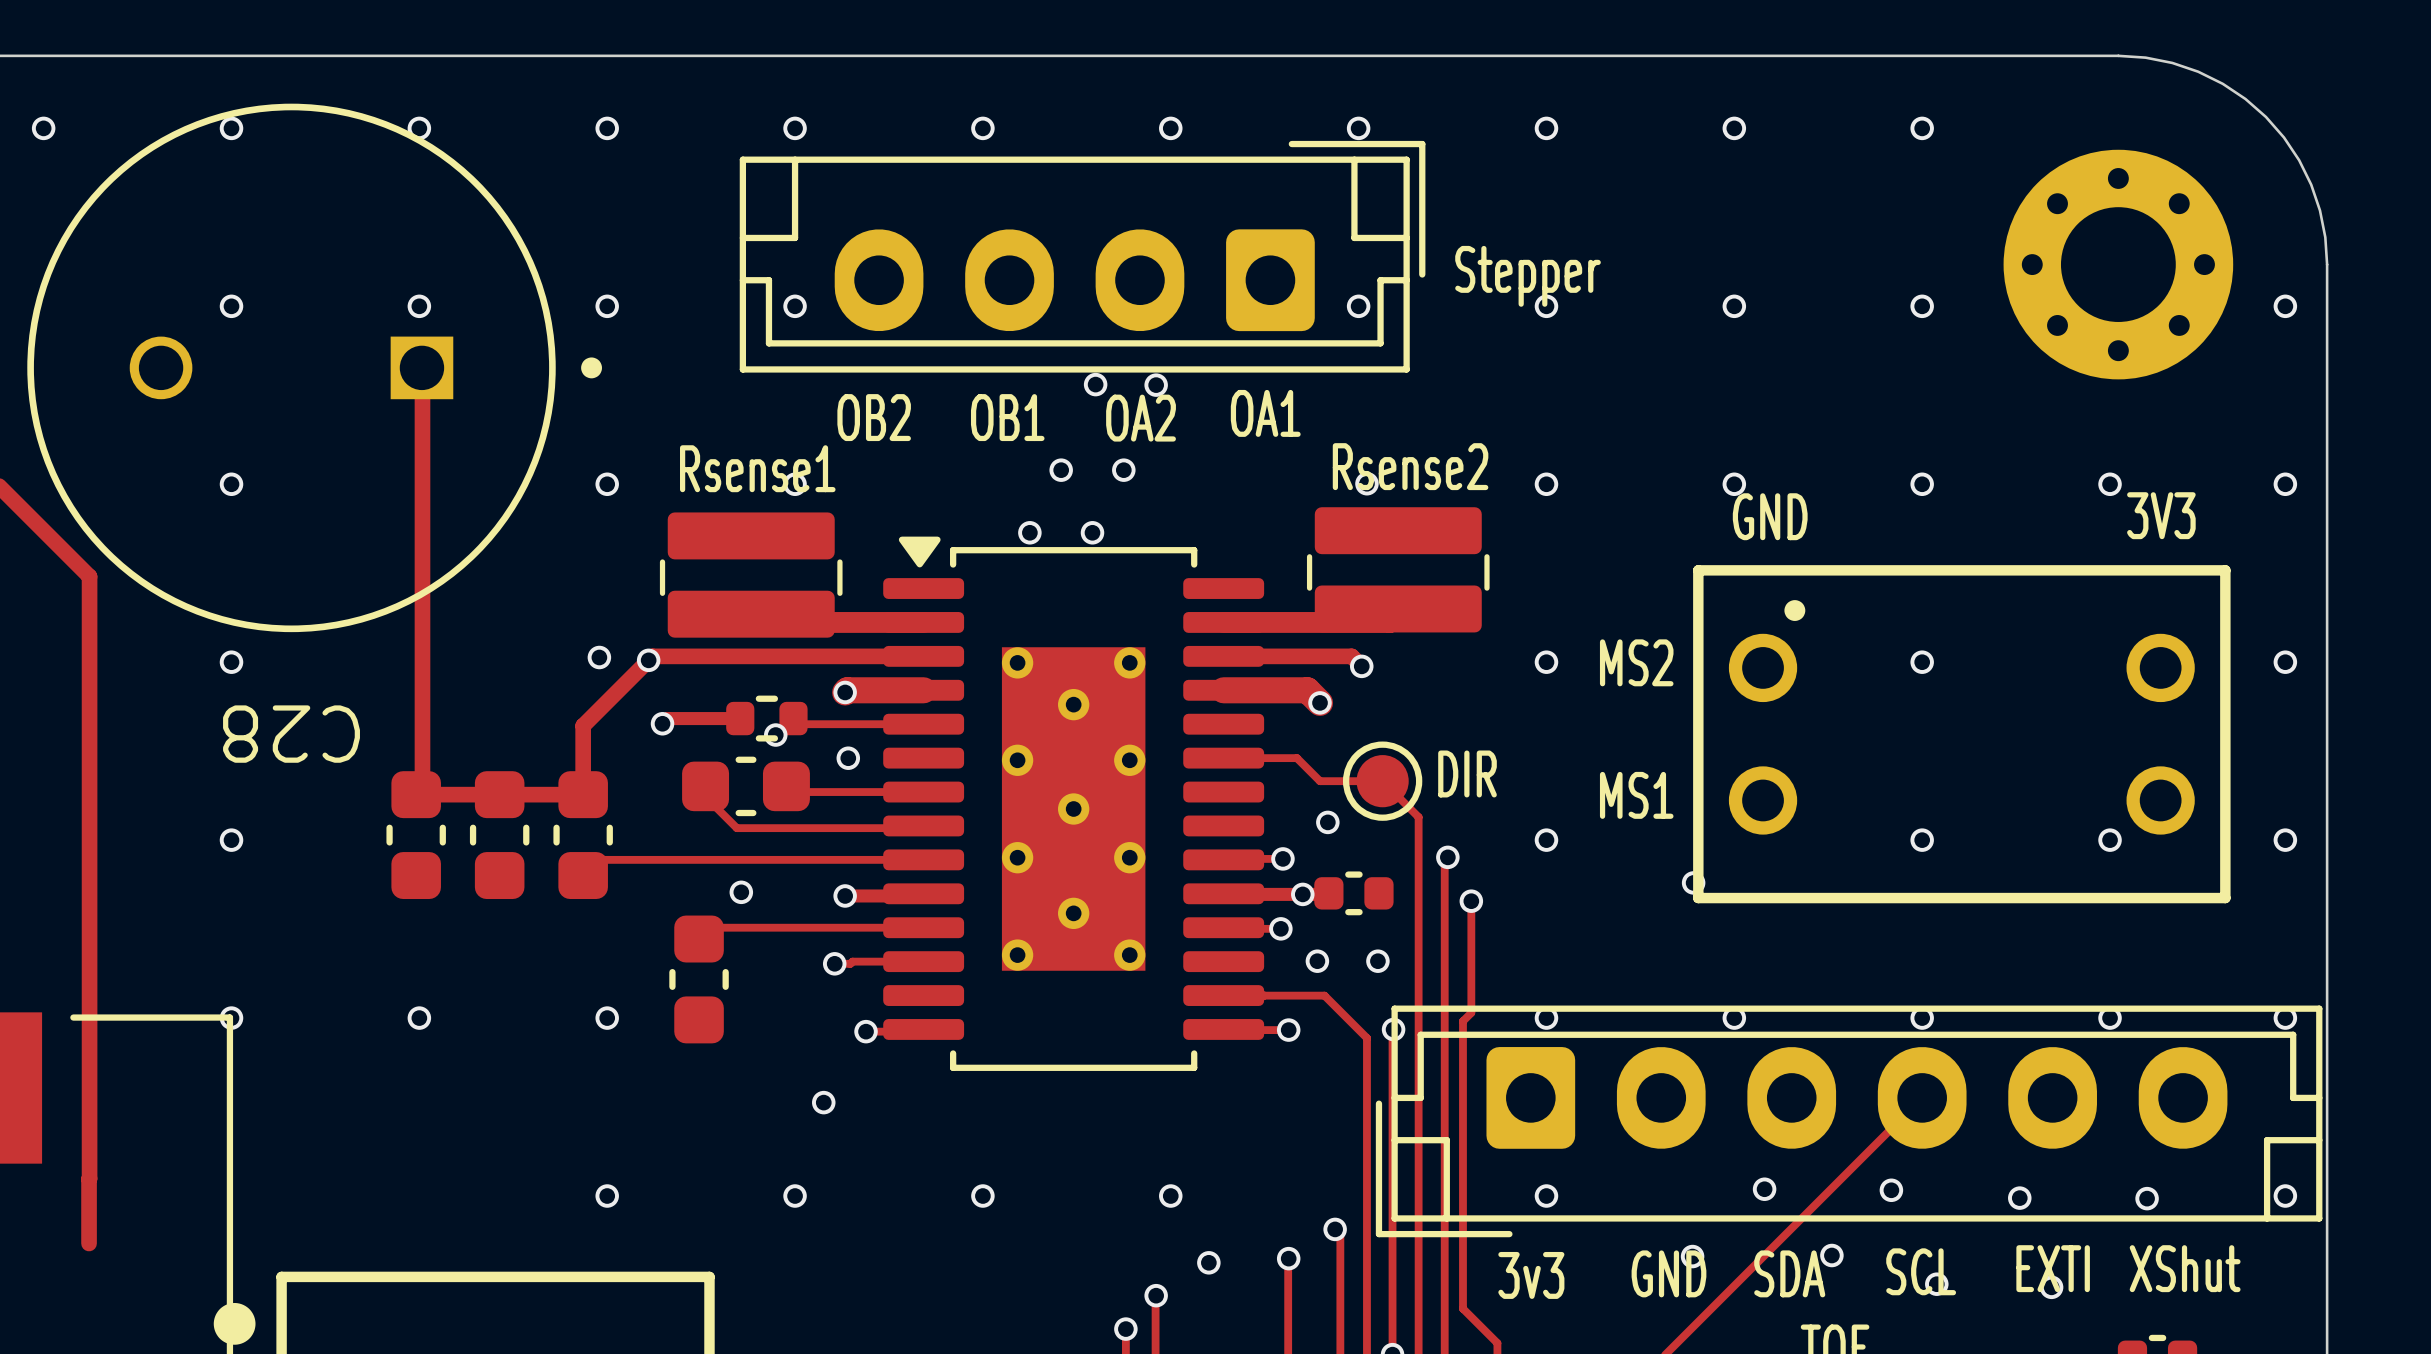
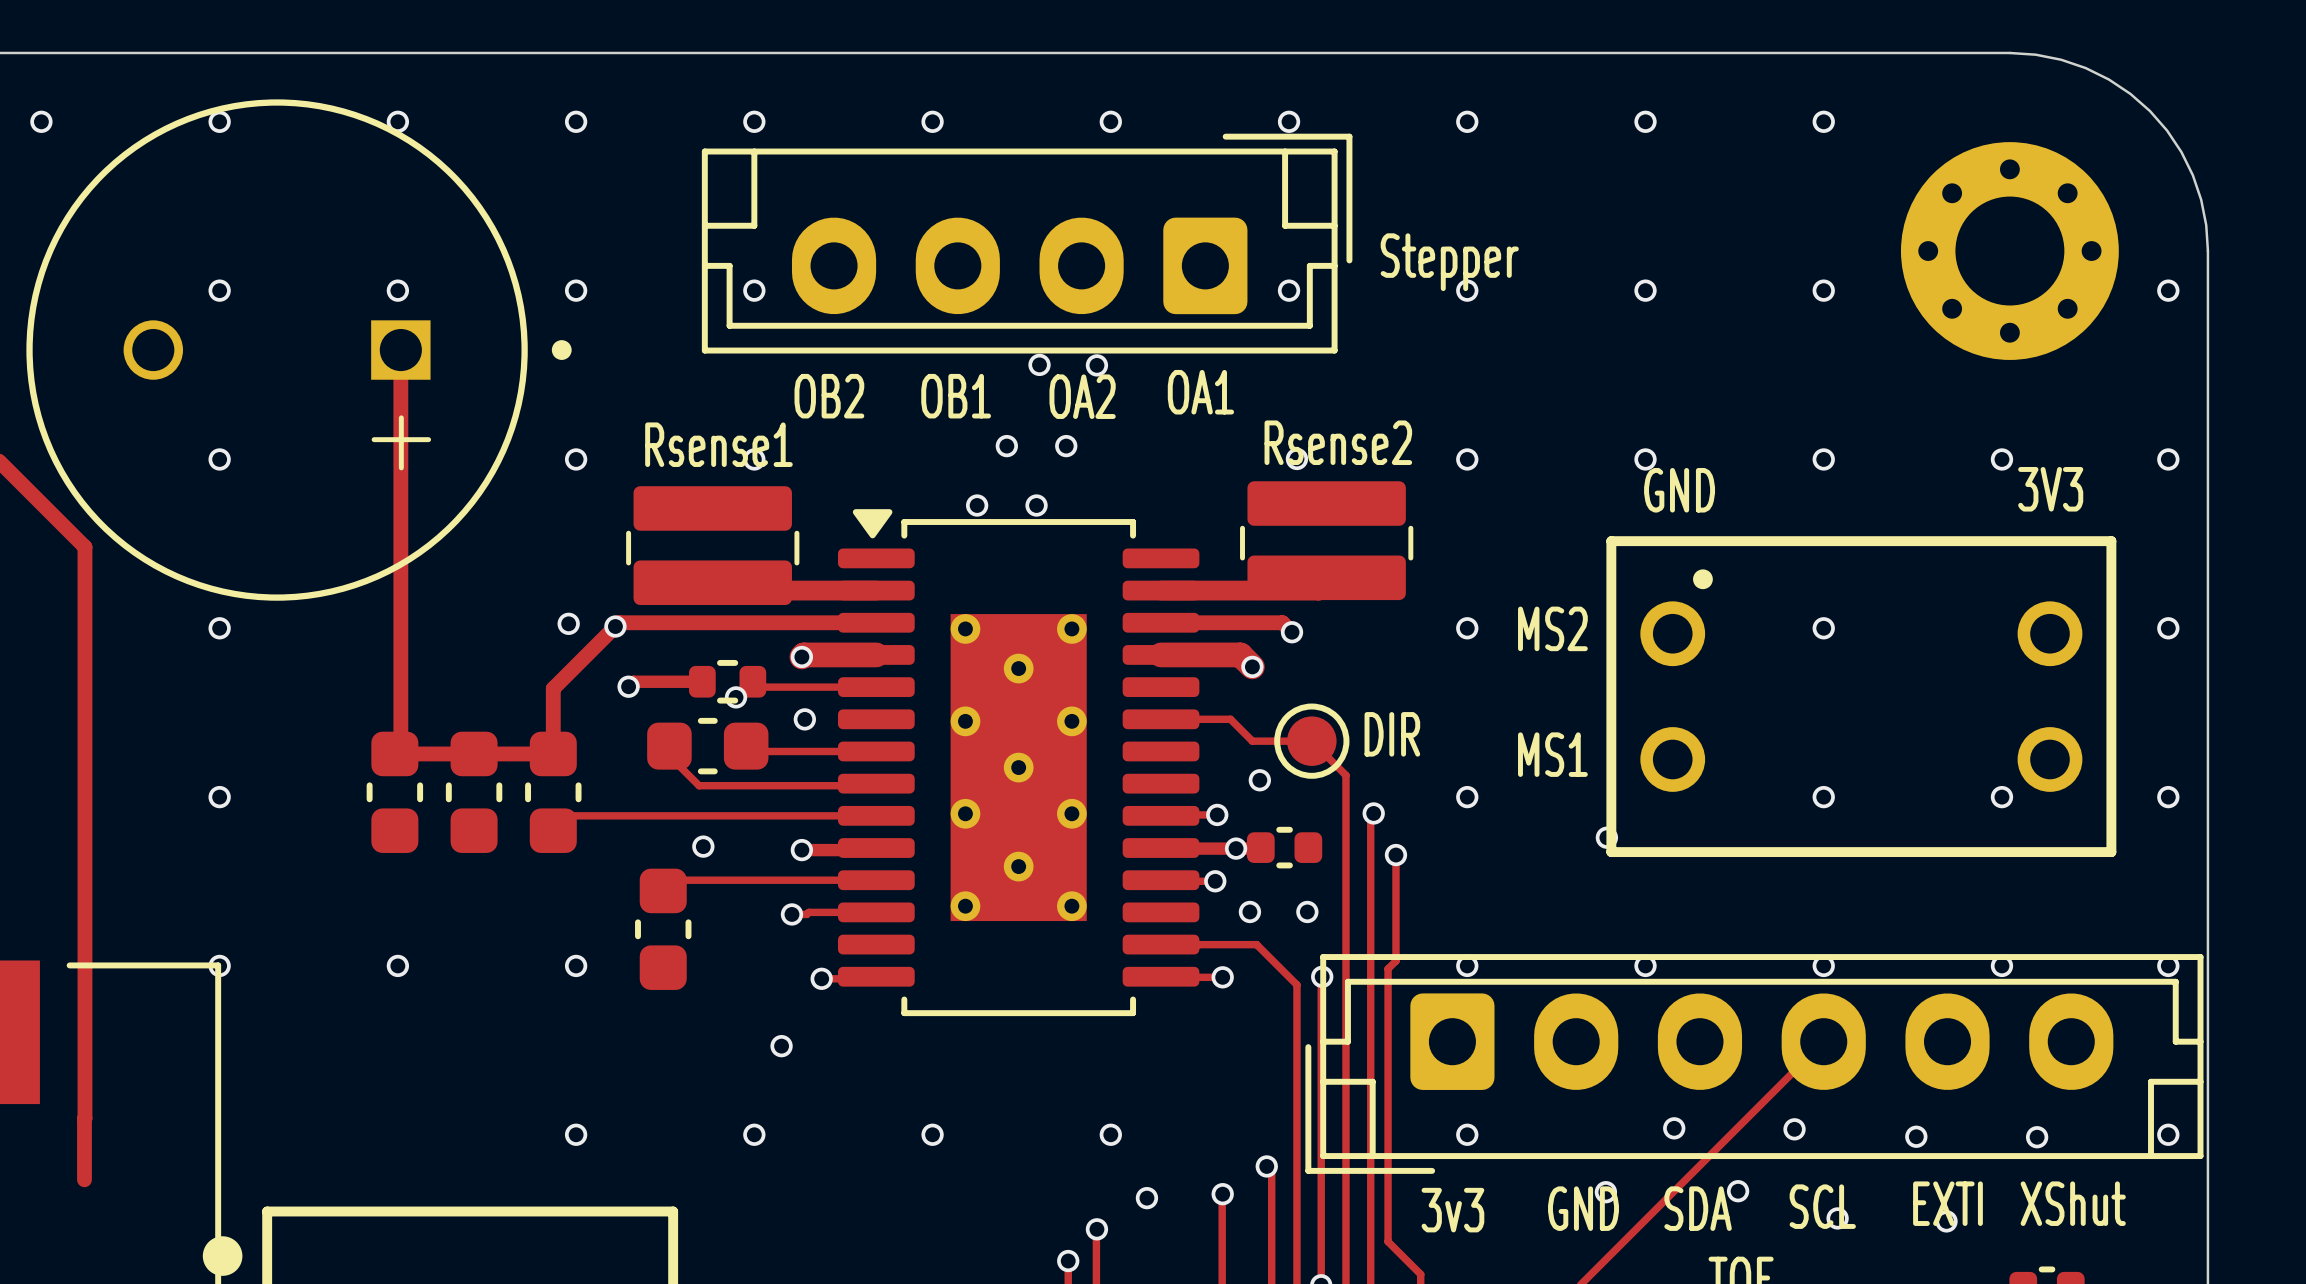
C28: (314, 367) -> none
part: none -> (299, 350)

